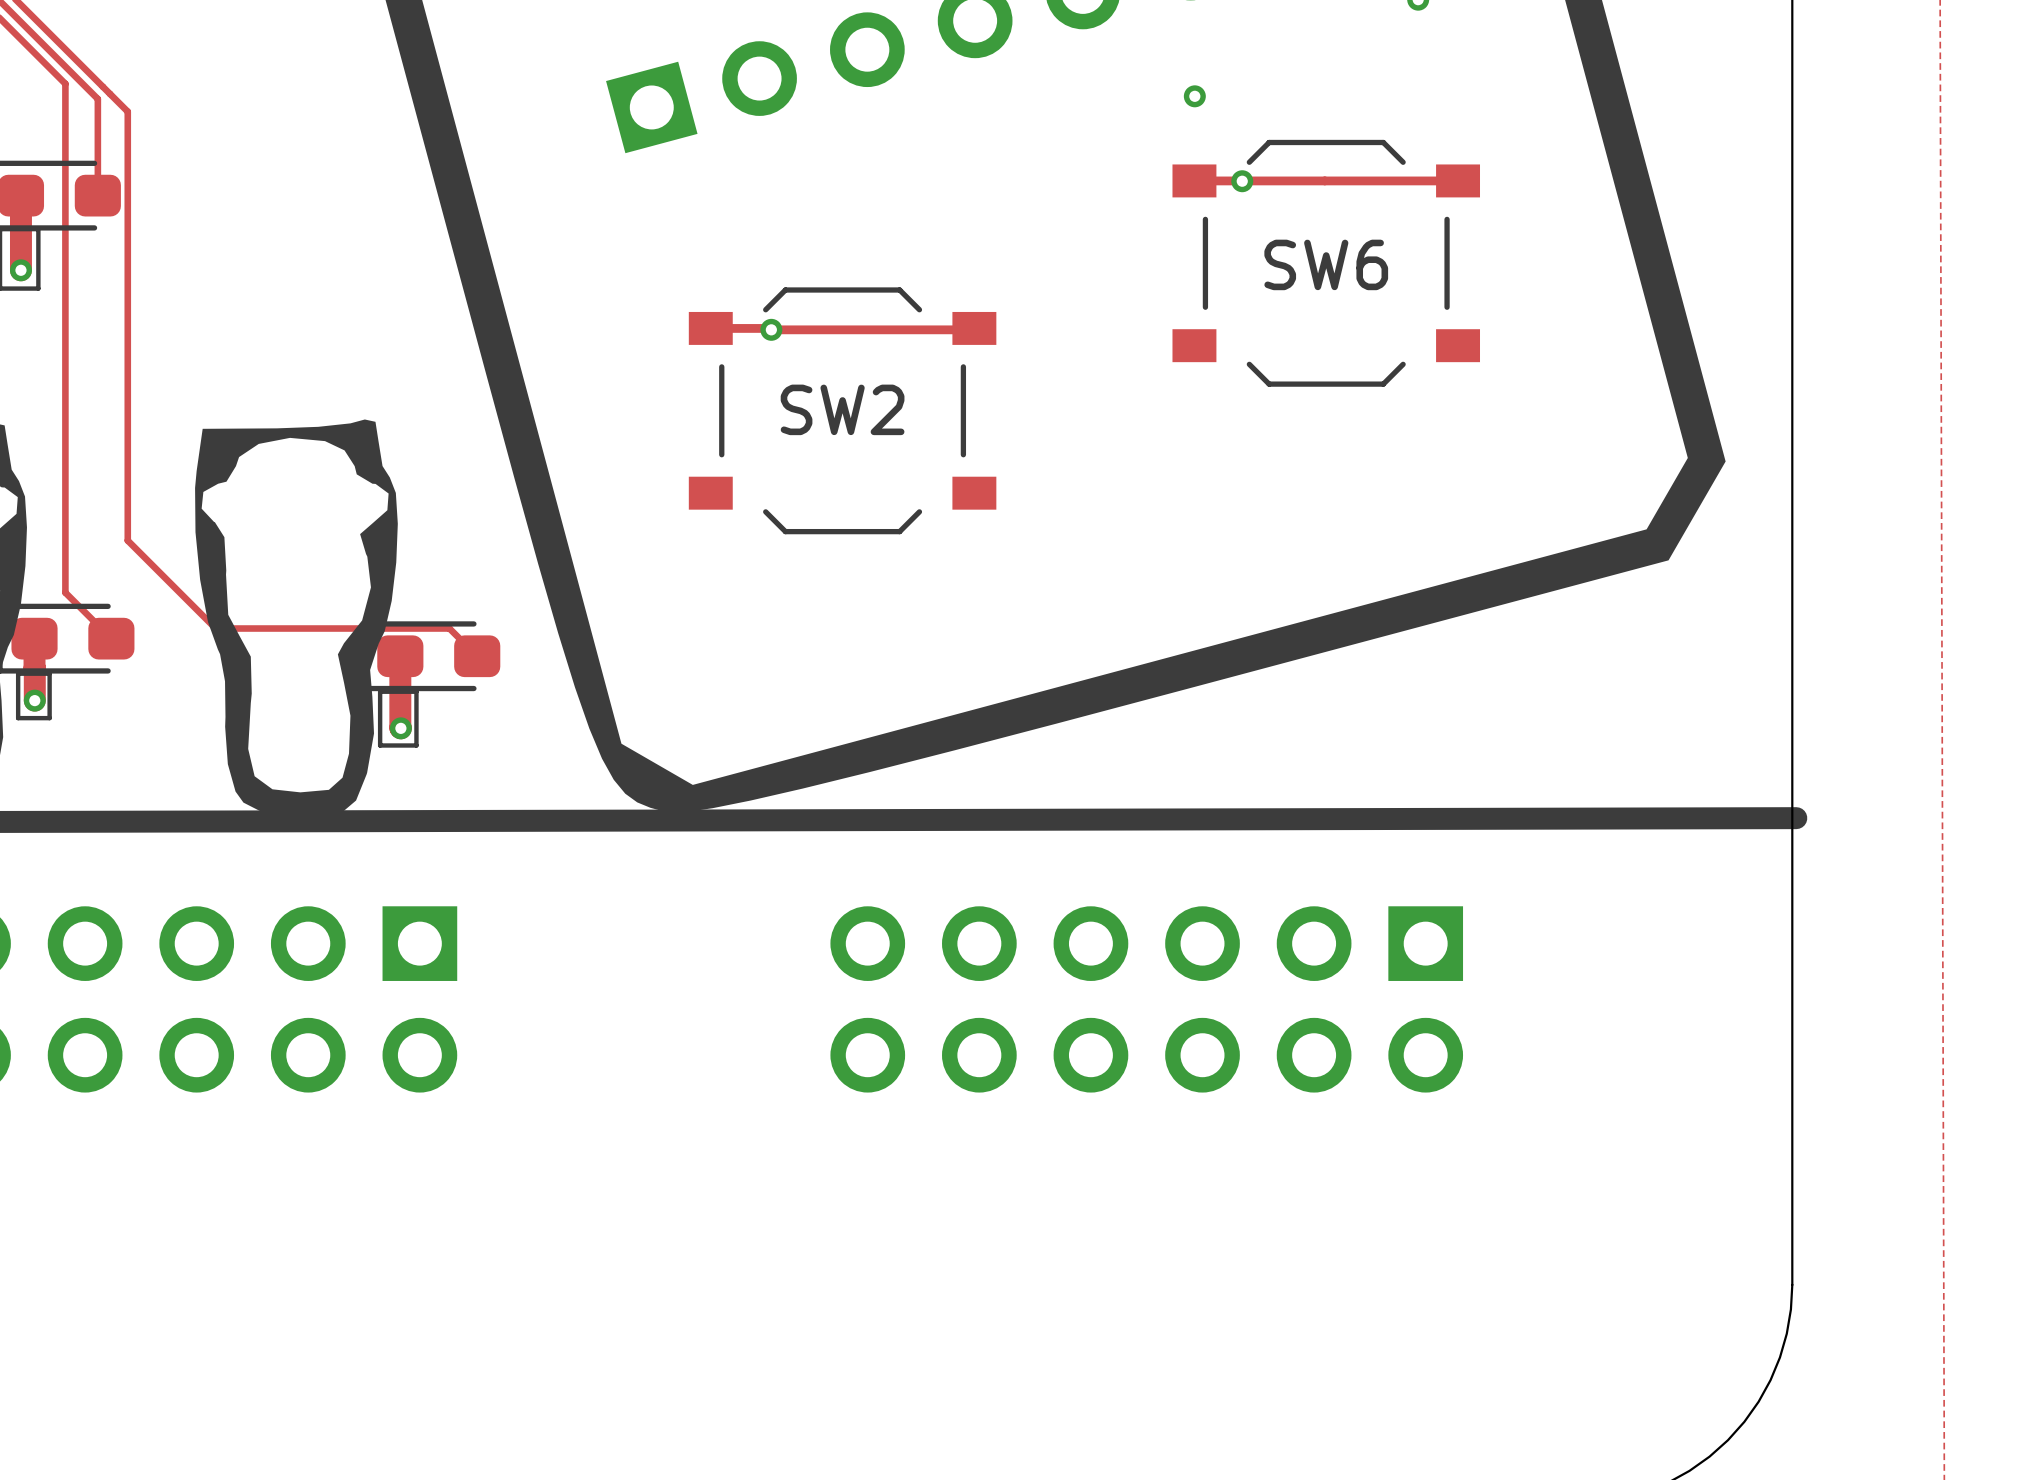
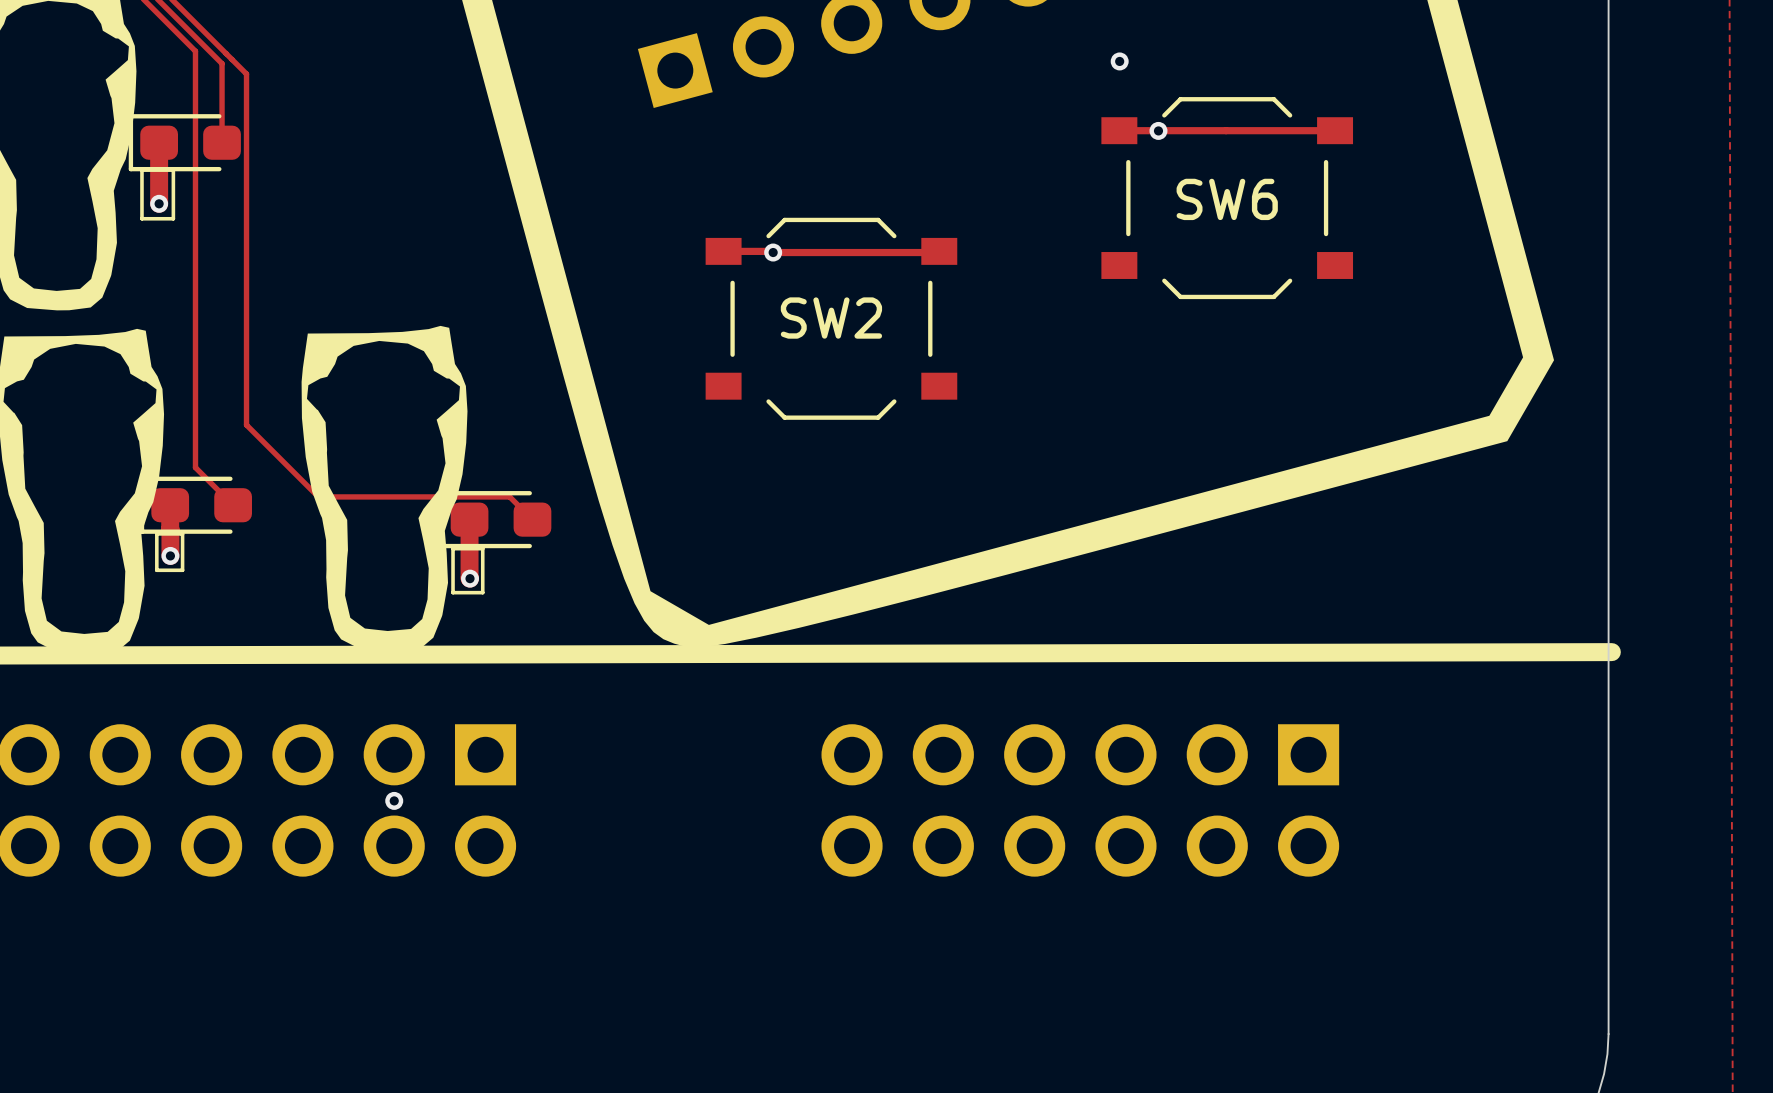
via: none -> (394, 800)

